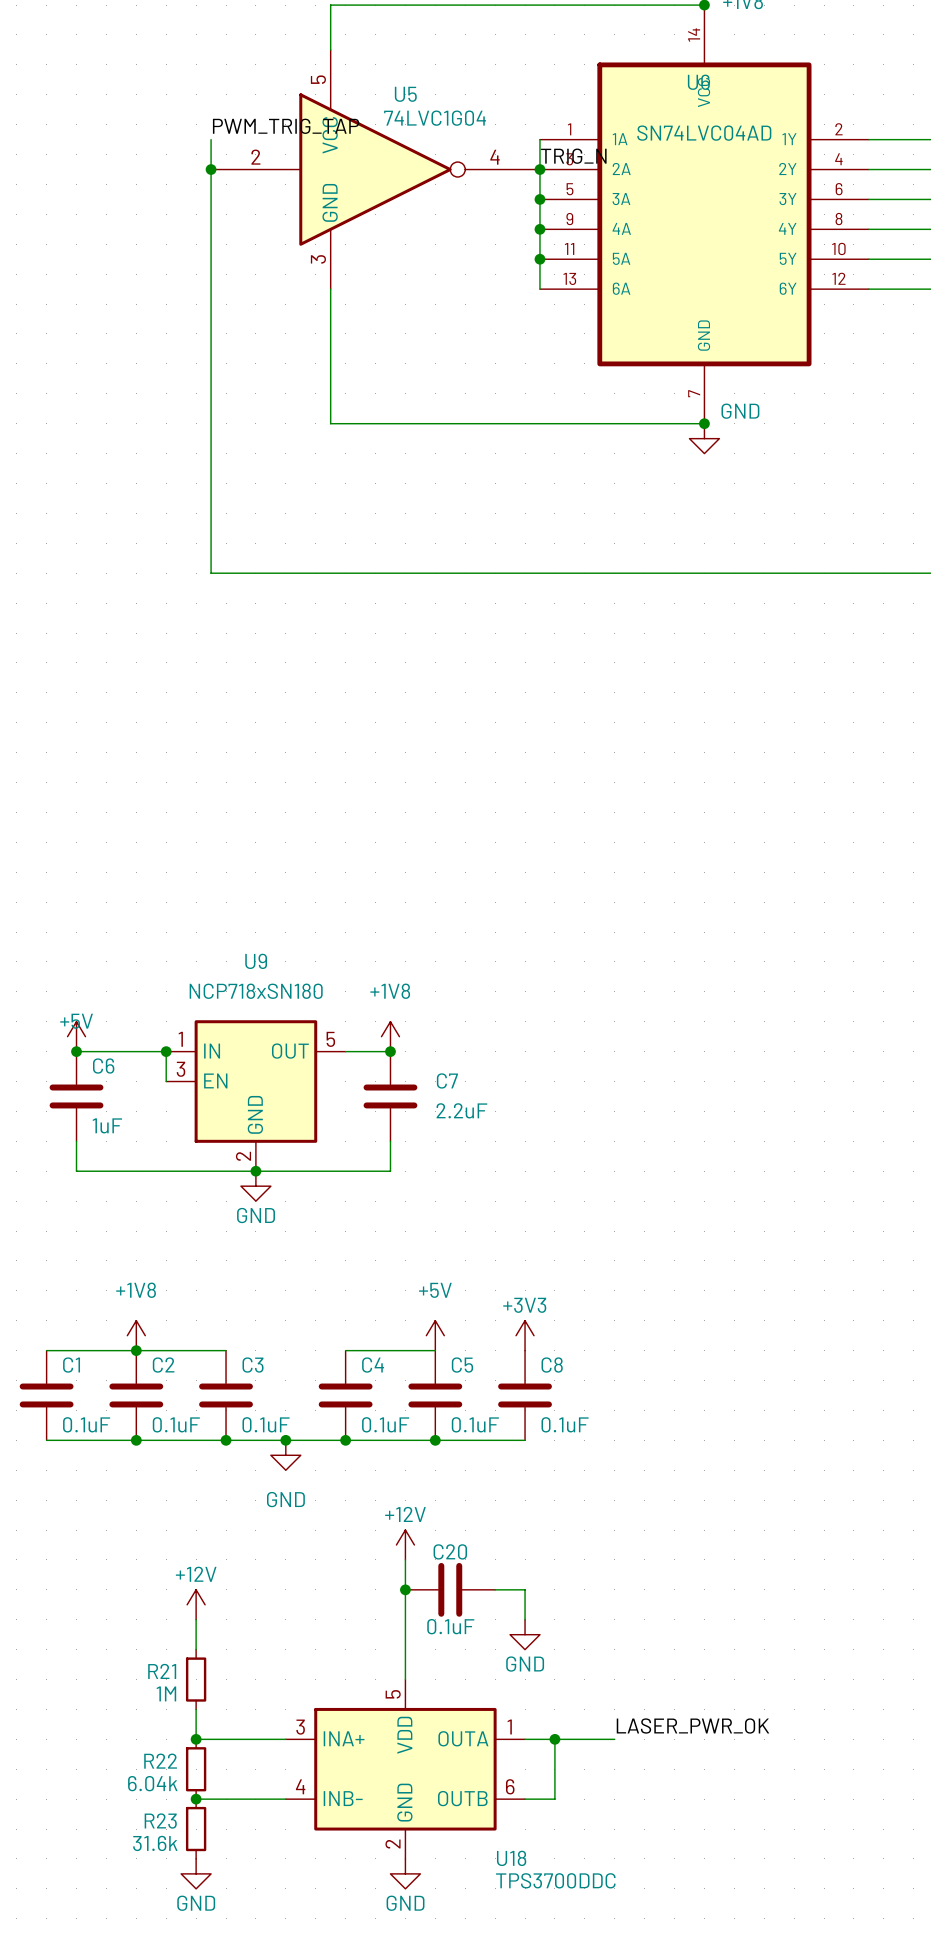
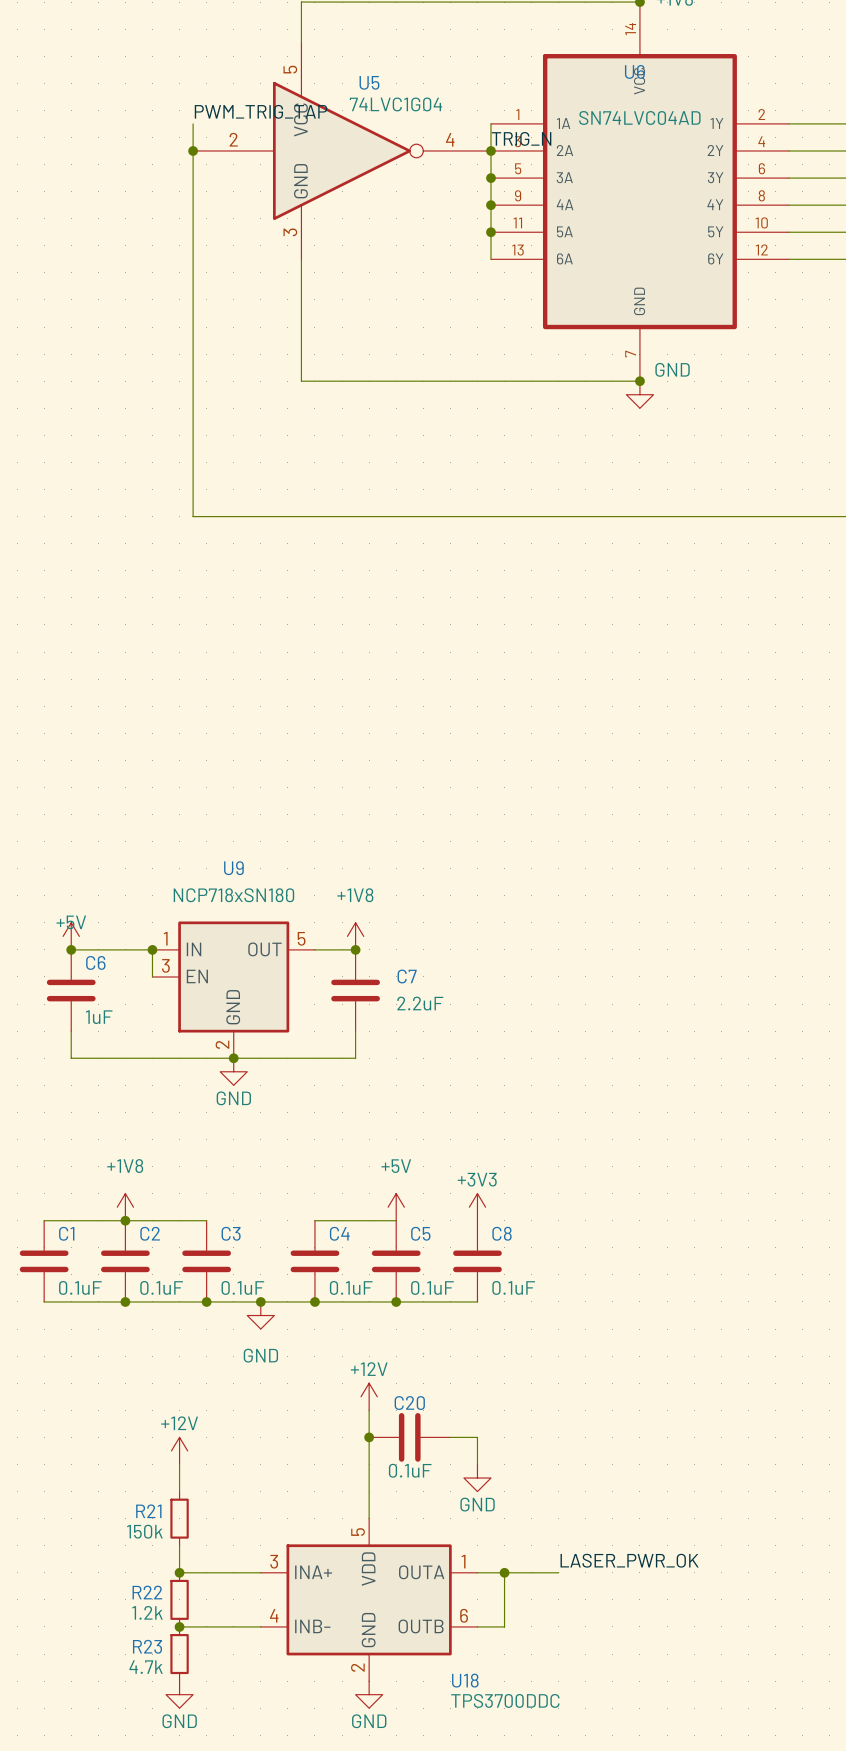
R21 value: 1M (166, 1693) -> 150k (144, 1531)
R22 value: 6.04k (152, 1783) -> 1.2k (147, 1612)
R23 value: 31.6k (155, 1843) -> 4.7k (146, 1667)

